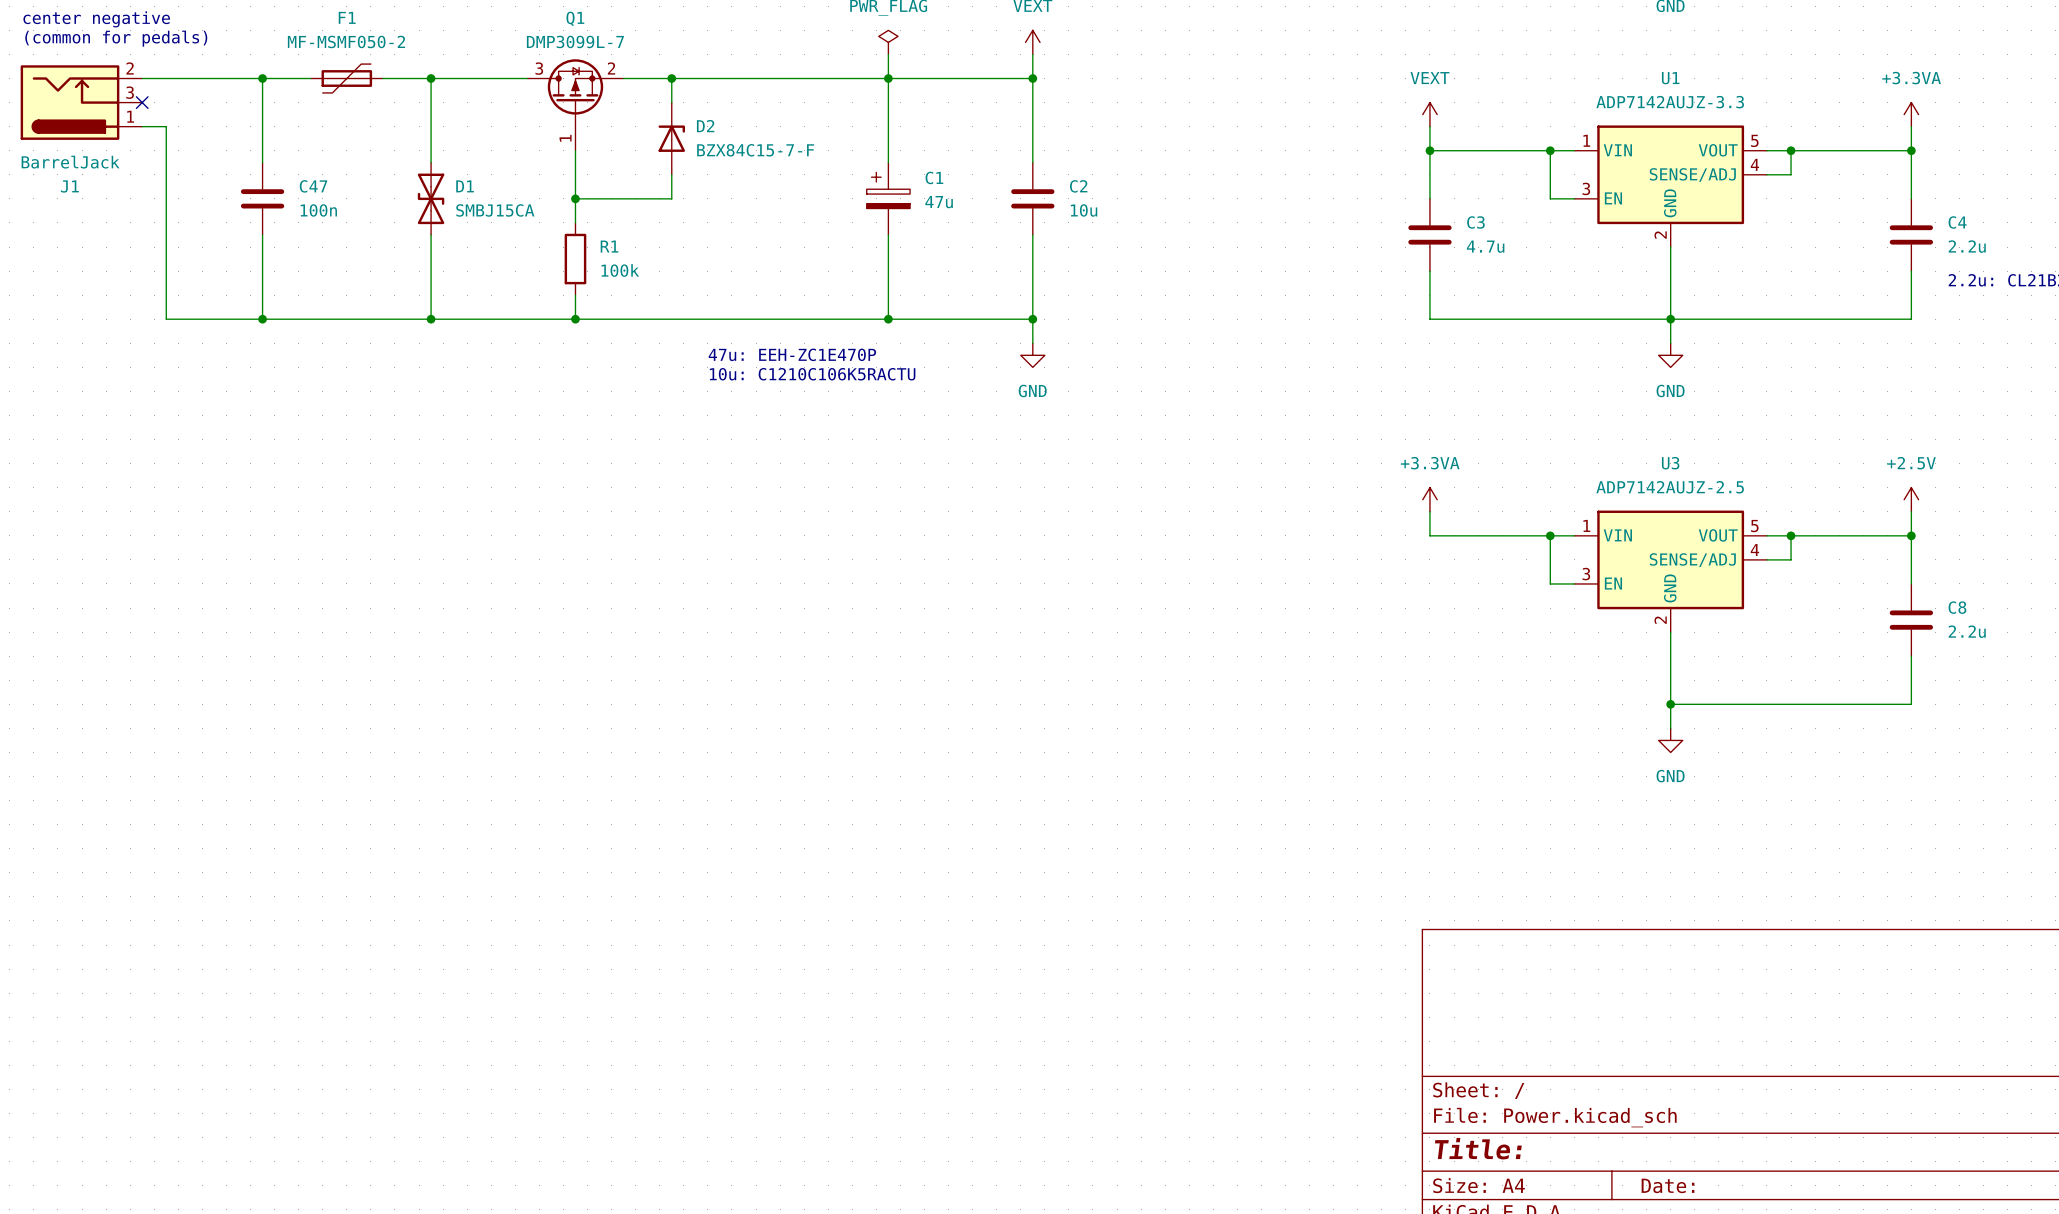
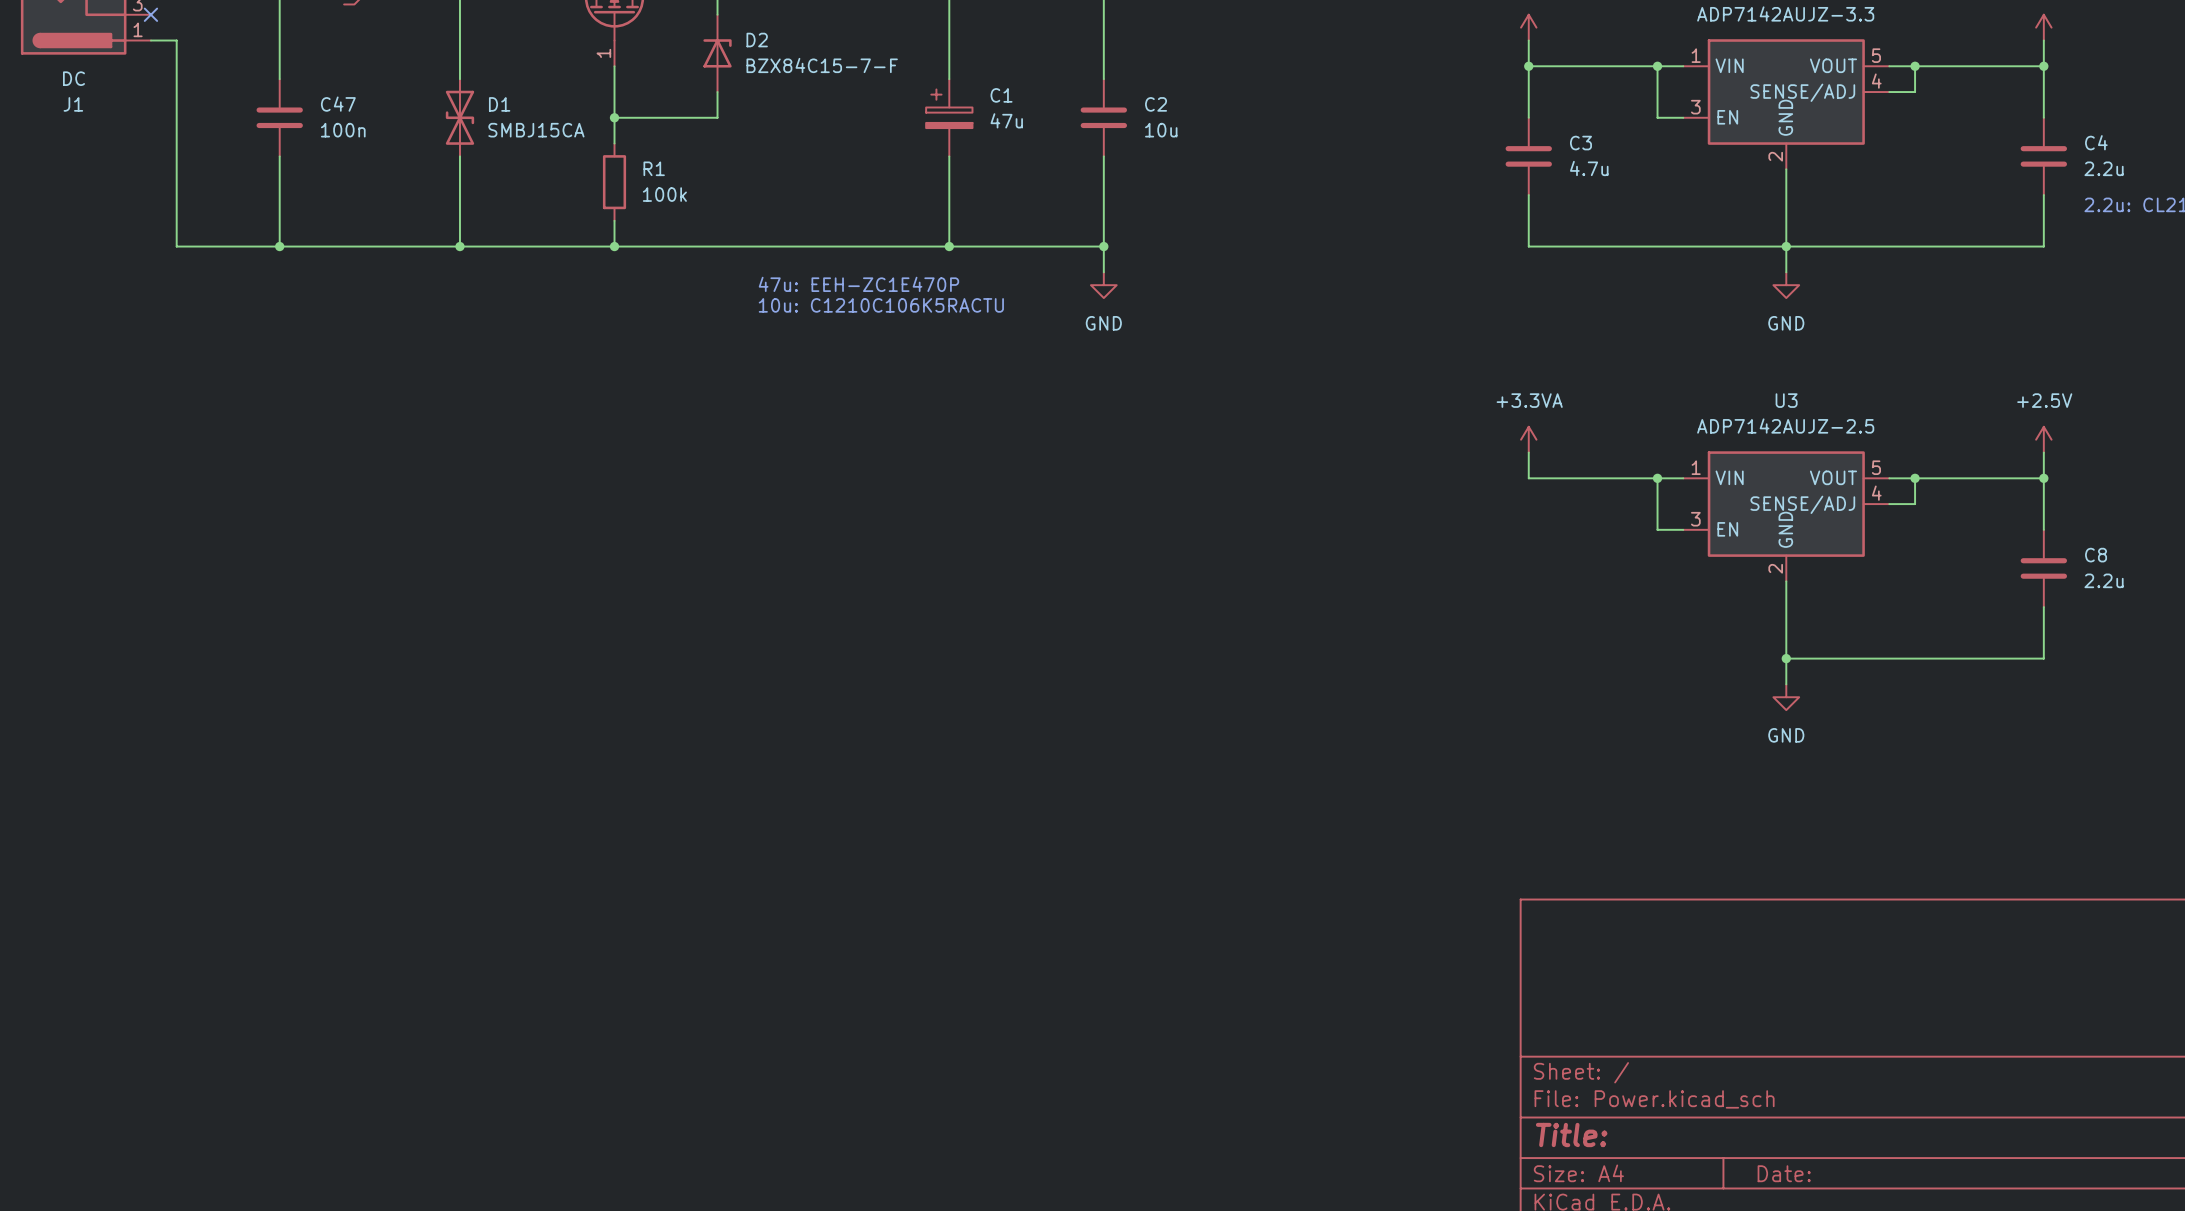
J1 value: BarrelJack (70, 162) -> DC (73, 78)

